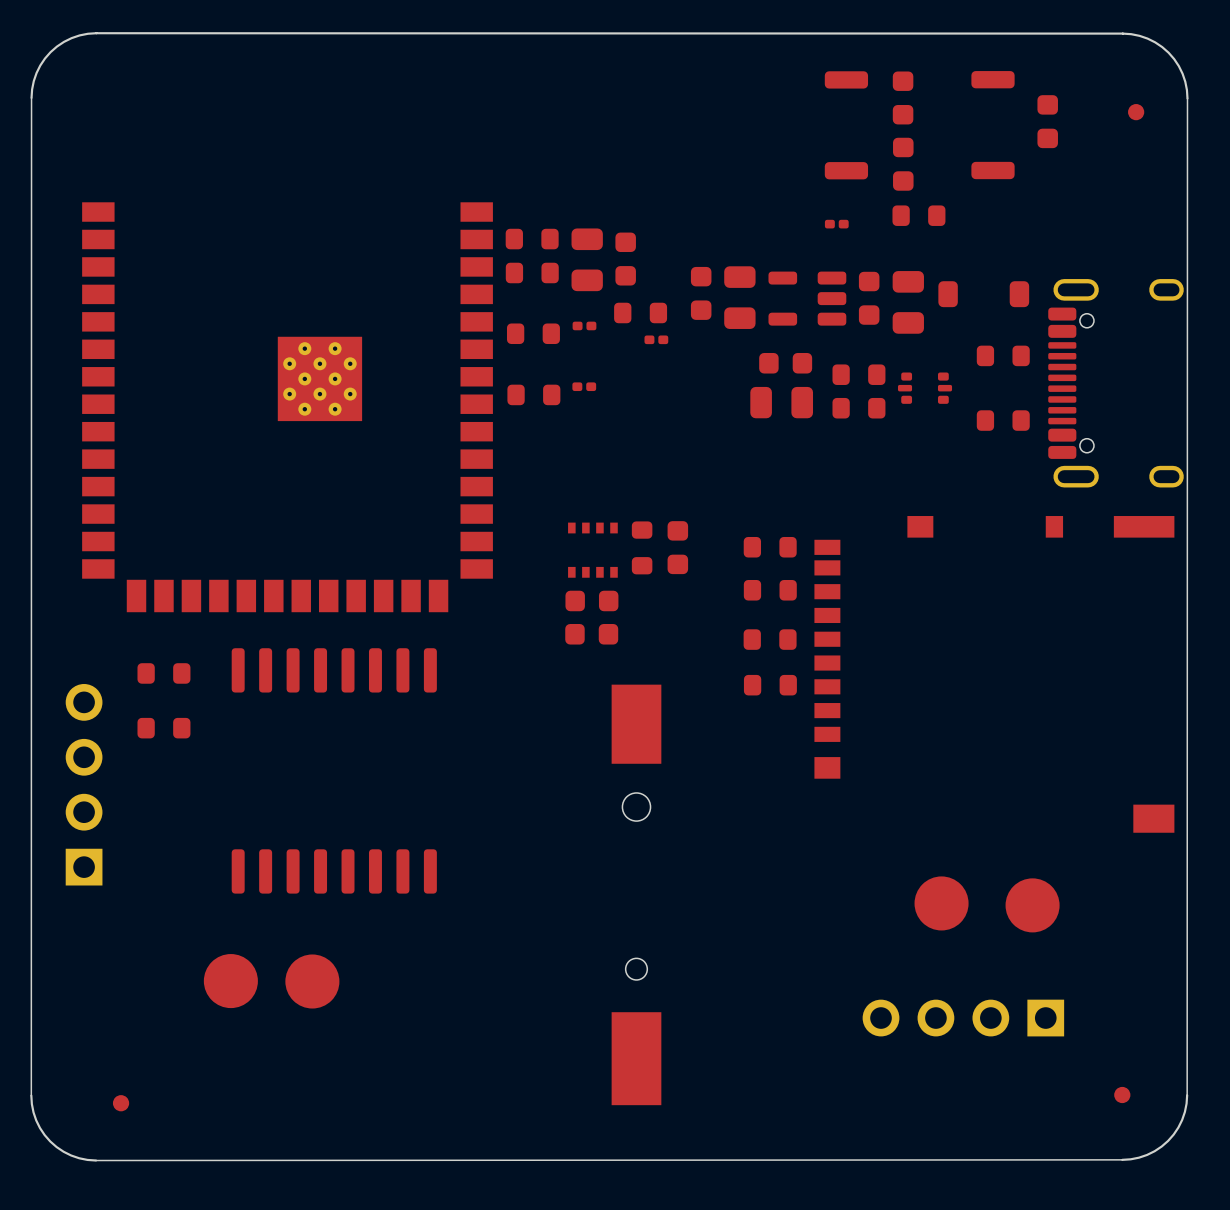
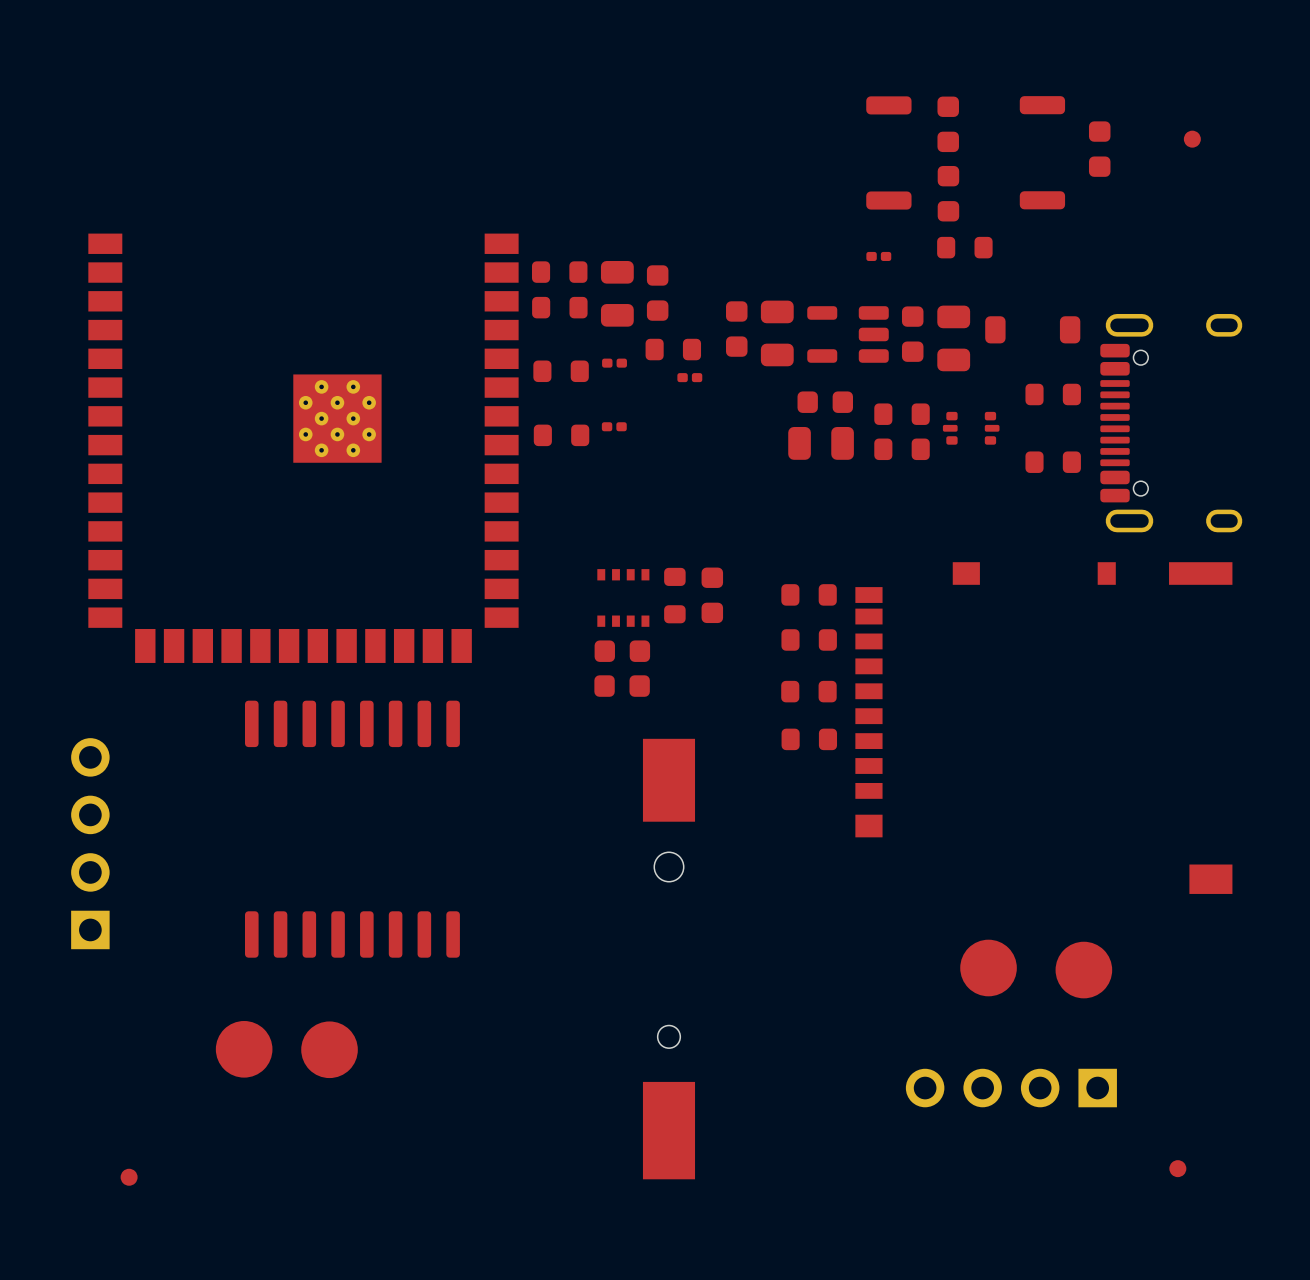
board edge: (96, 33) (1122, 33) (1147, 38) (1168, 52) (1182, 73) (1187, 98) (1187, 1095) (1182, 1119) (1168, 1140) (1147, 1154) (1122, 1159) (95, 1160) (71, 1155) (50, 1141) (36, 1120) (31, 1095) (31, 97) (36, 73) (50, 52) (71, 38) (96, 33) -> none
part: (163, 673) -> none
part: (163, 728) -> none

